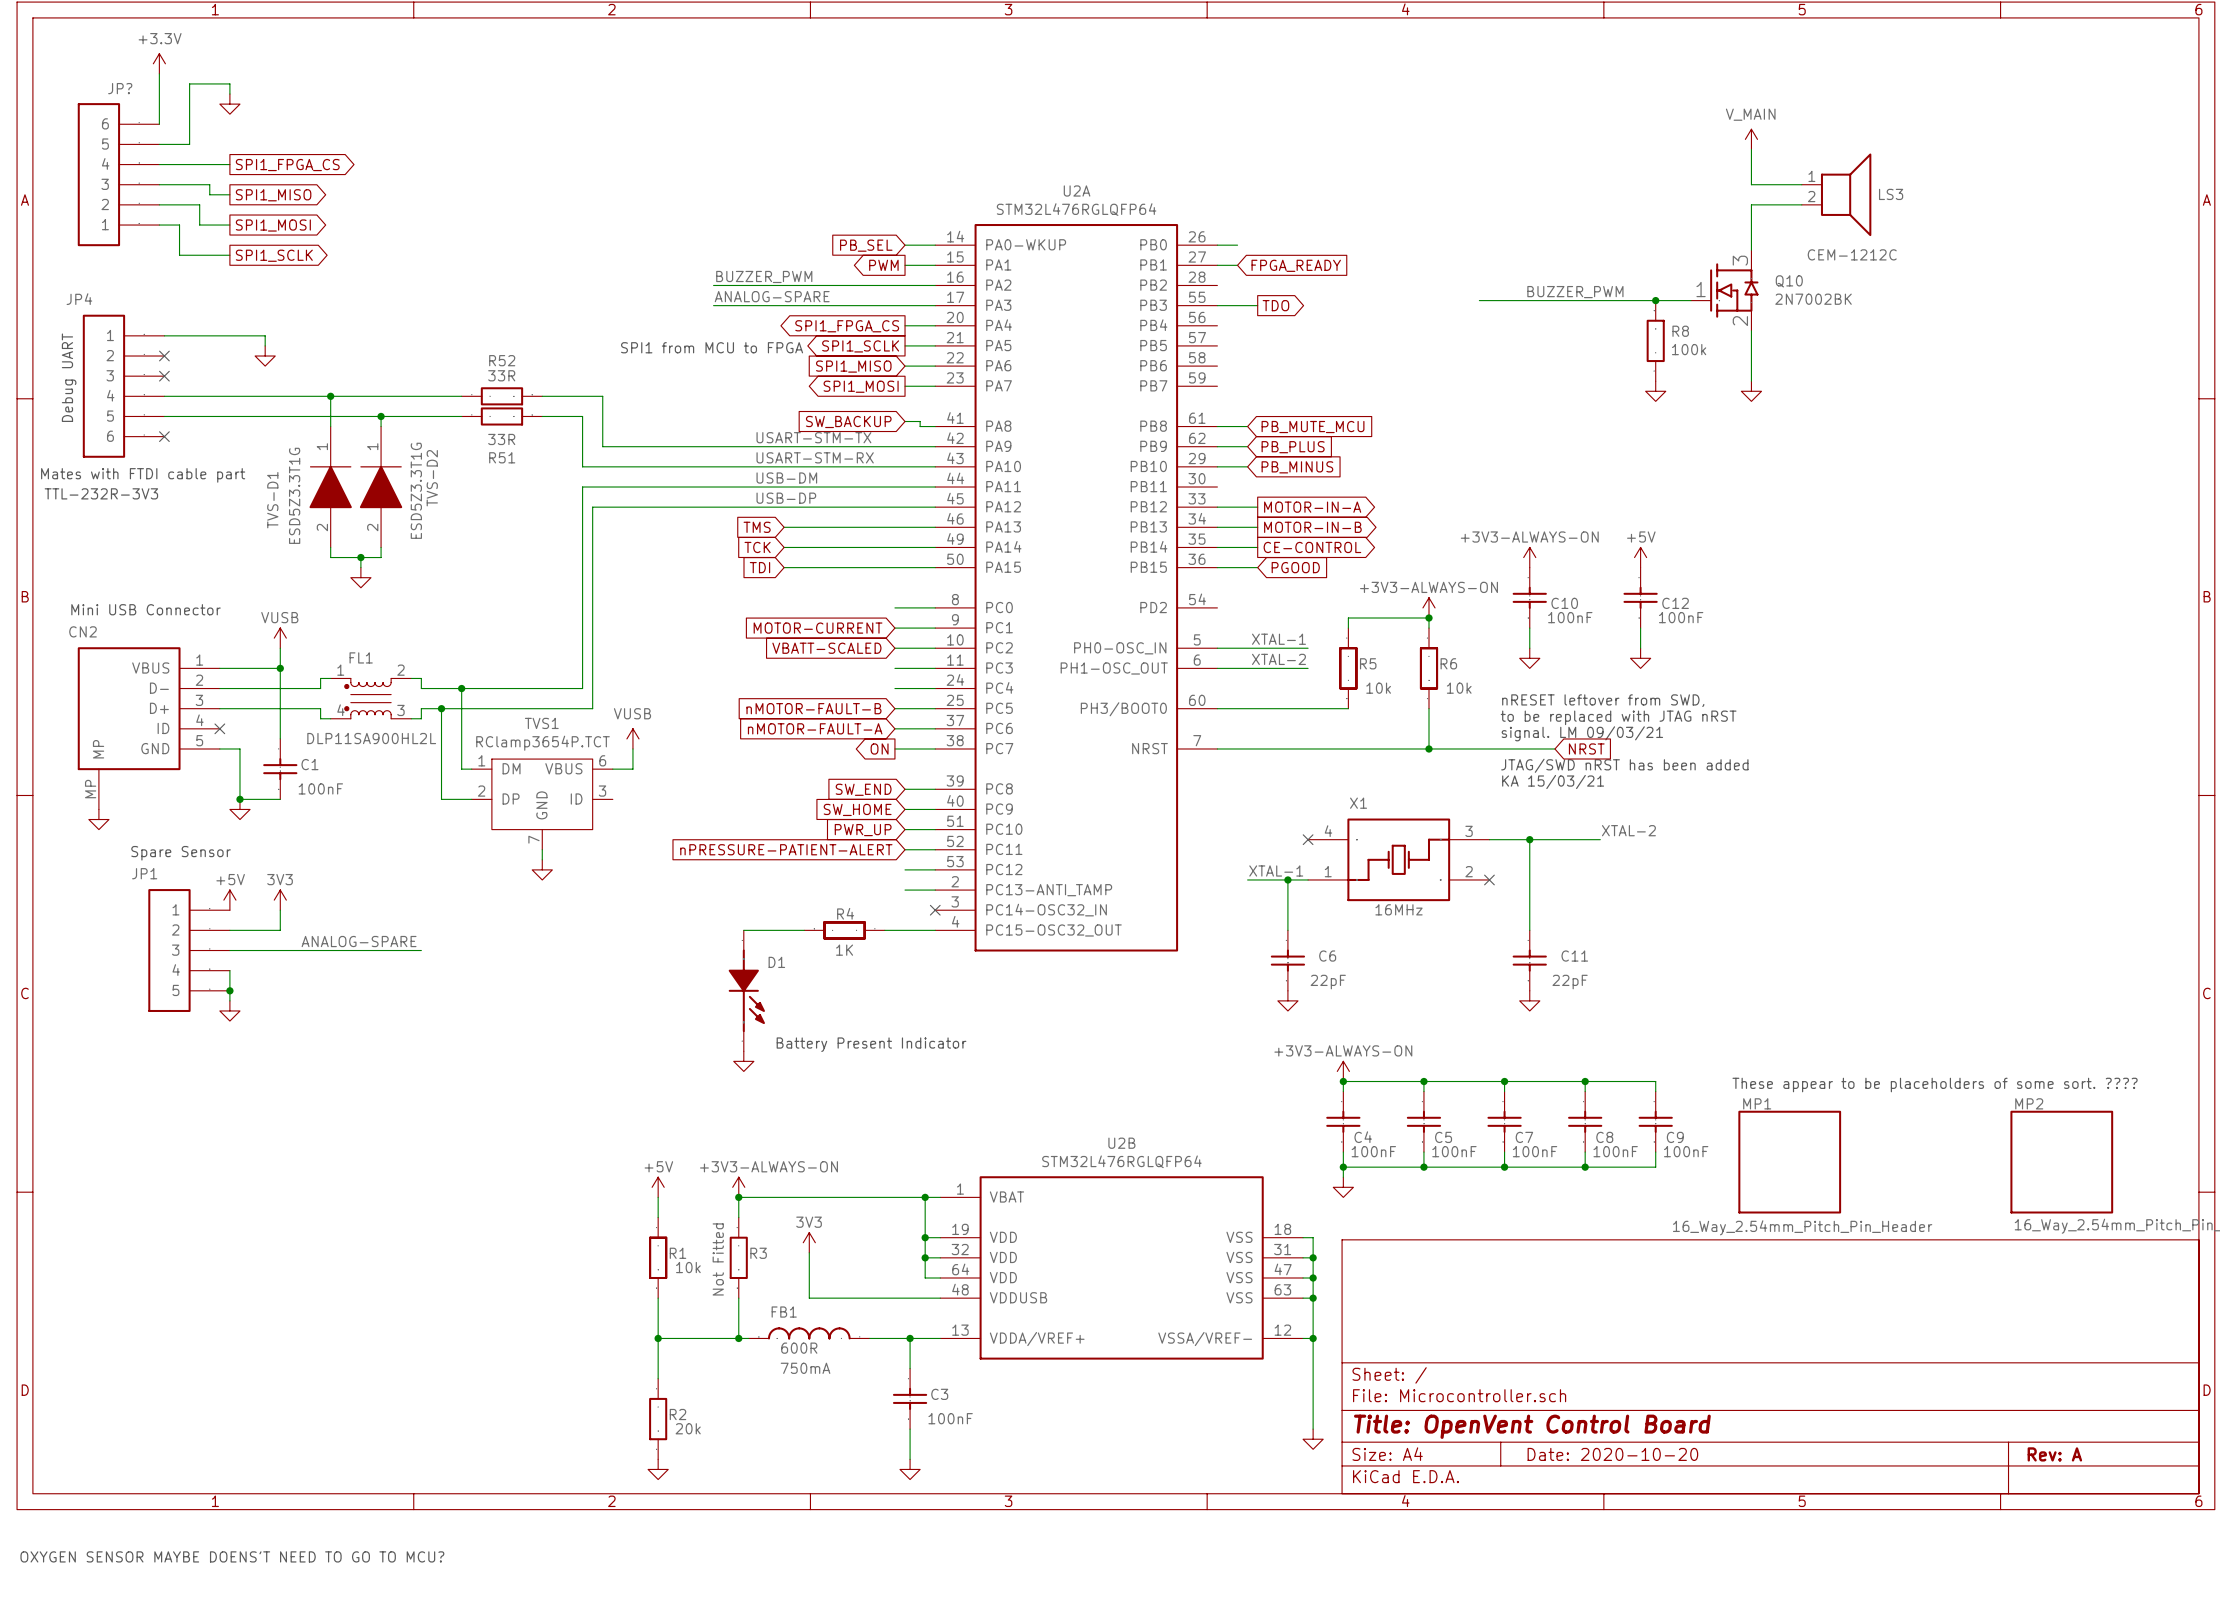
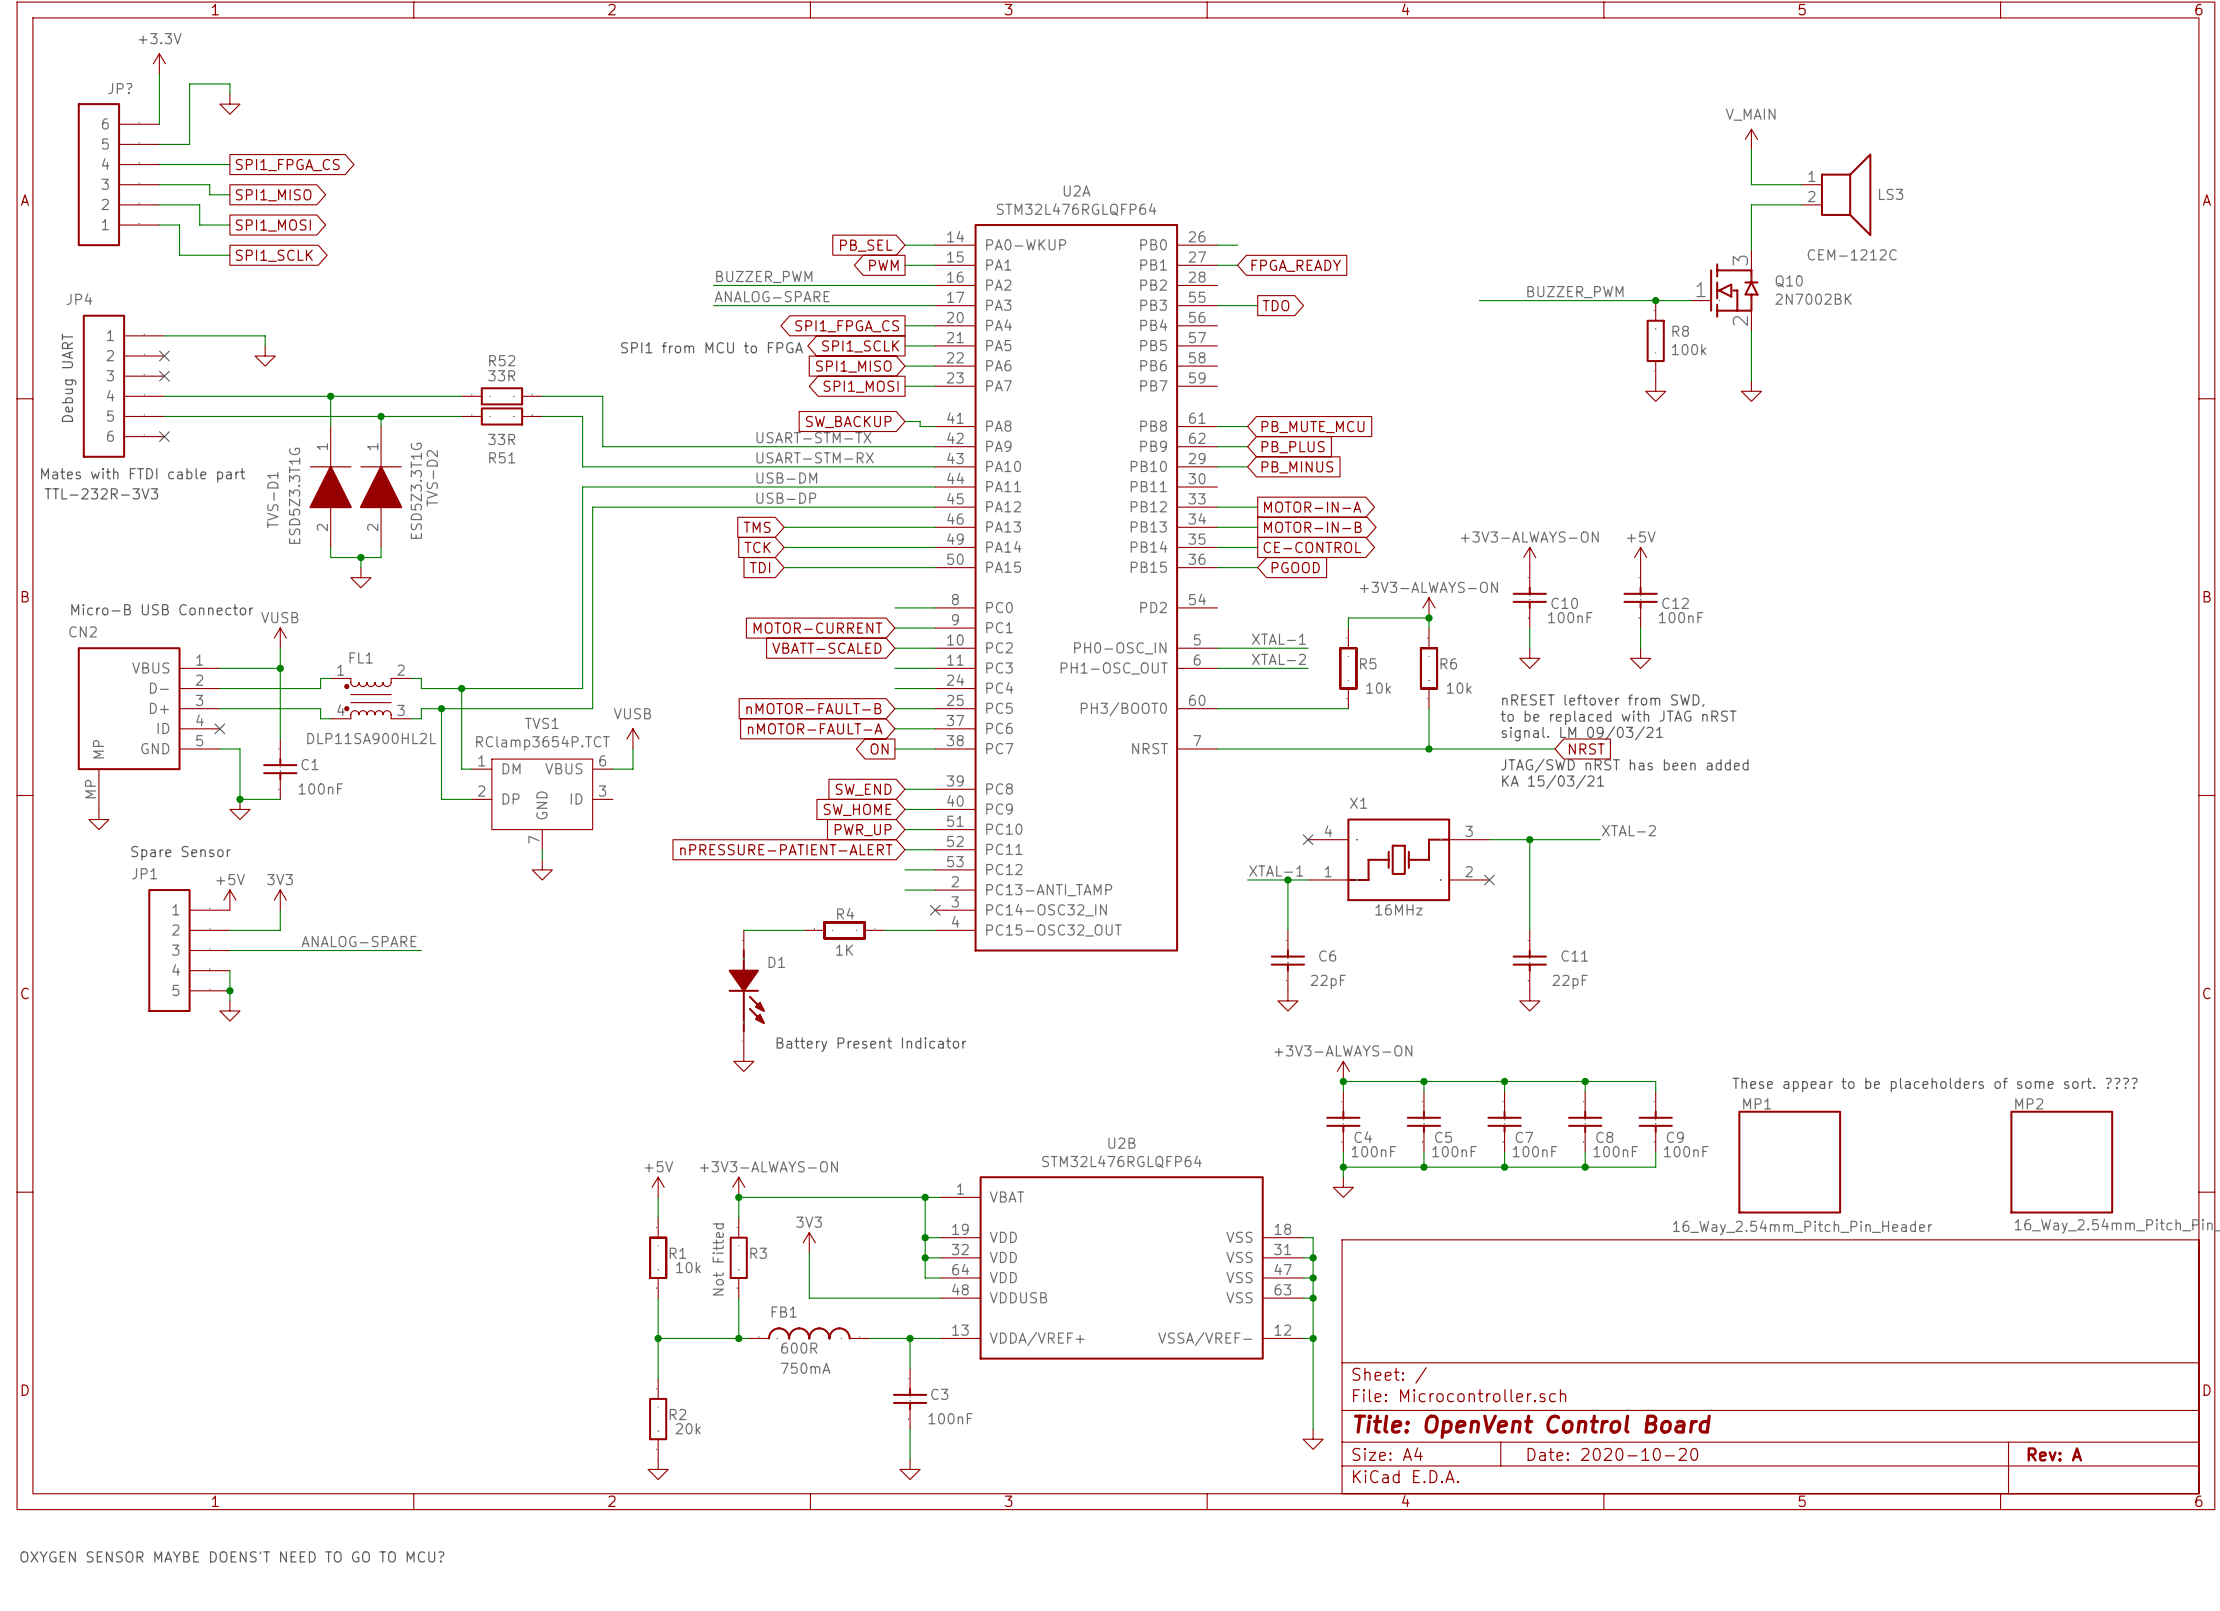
text: Mini USB Connector (146, 609) -> Micro-B USB Connector (162, 609)

